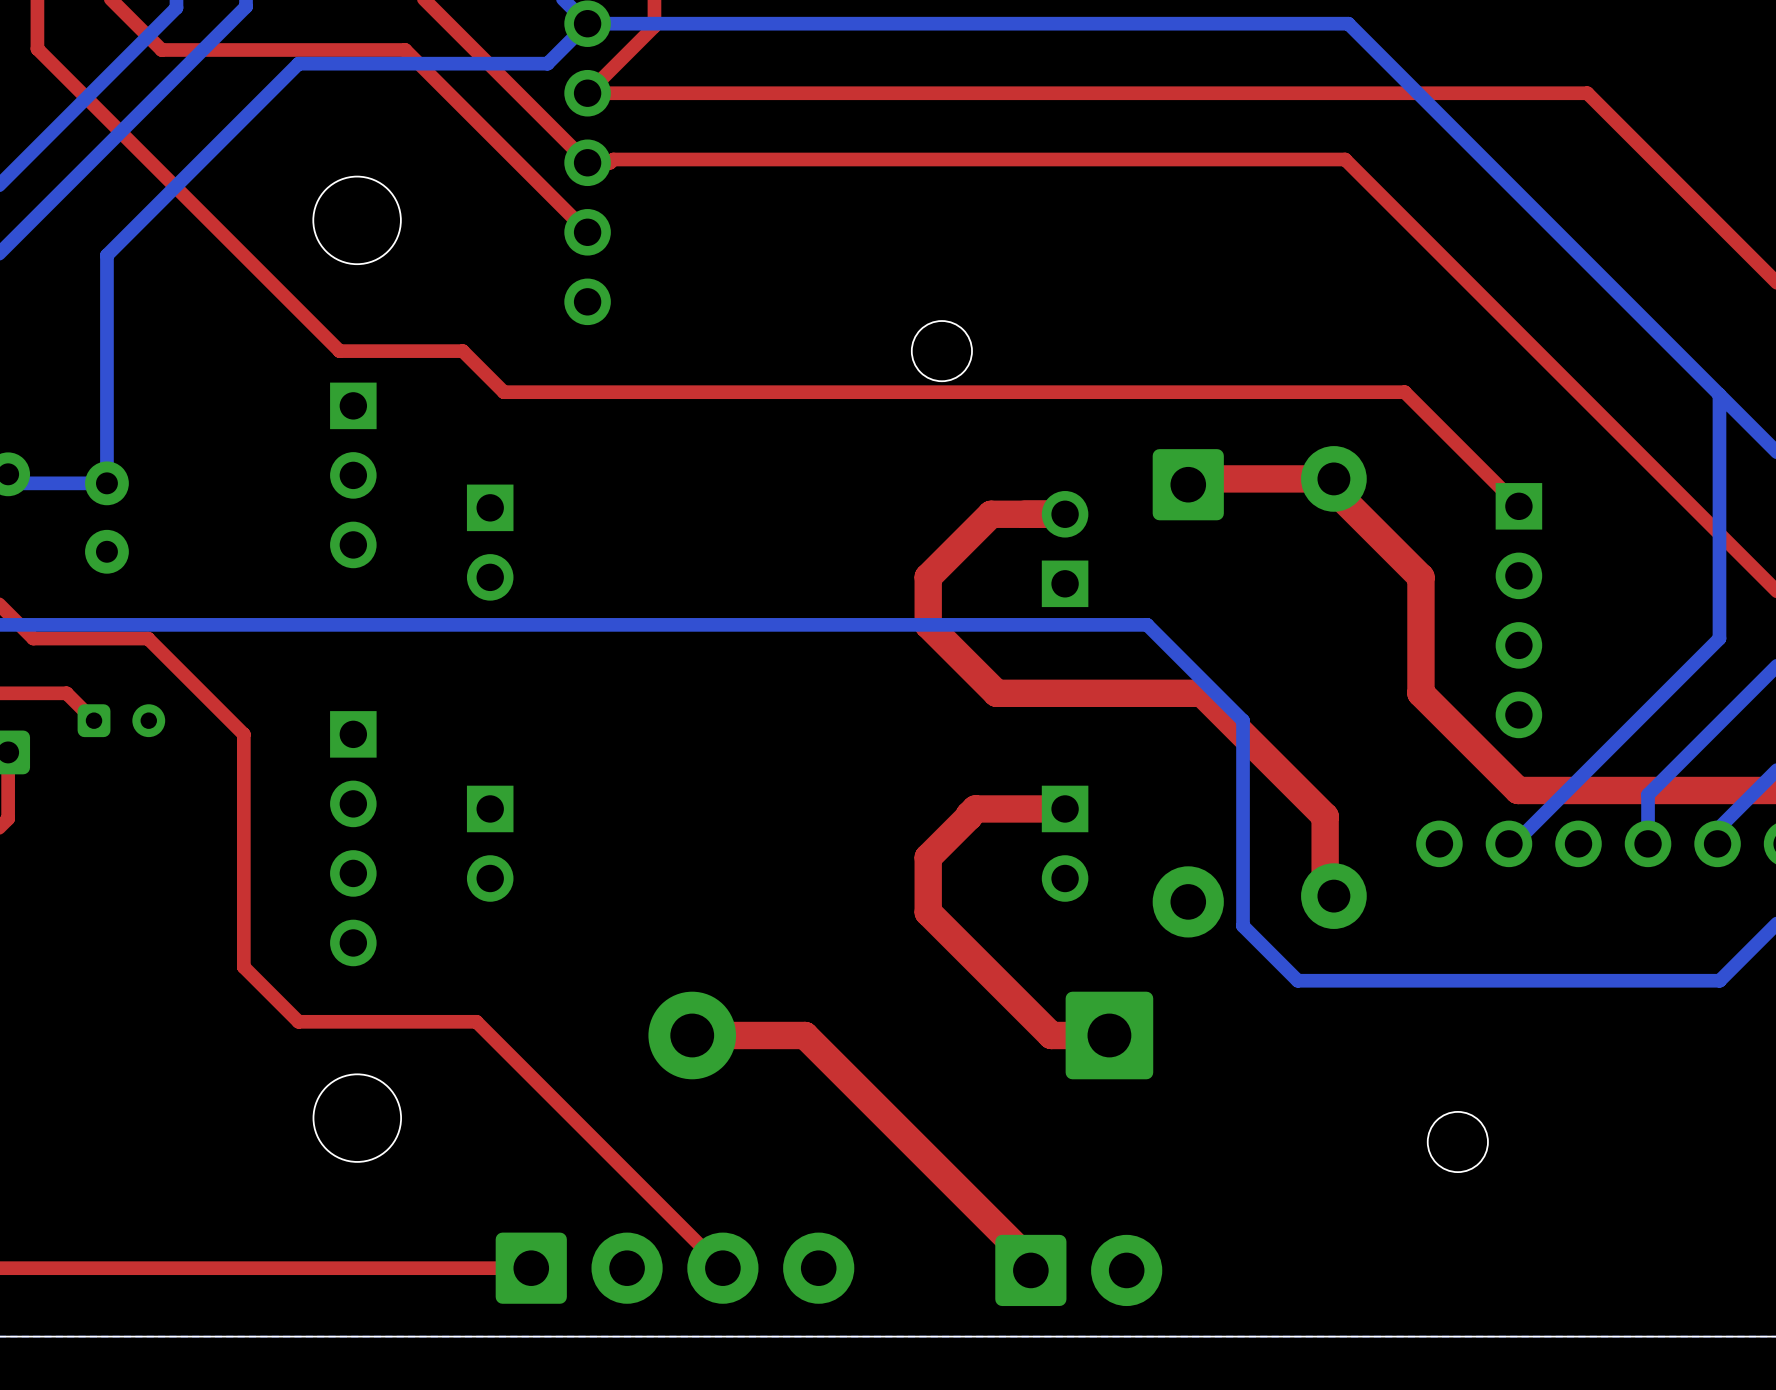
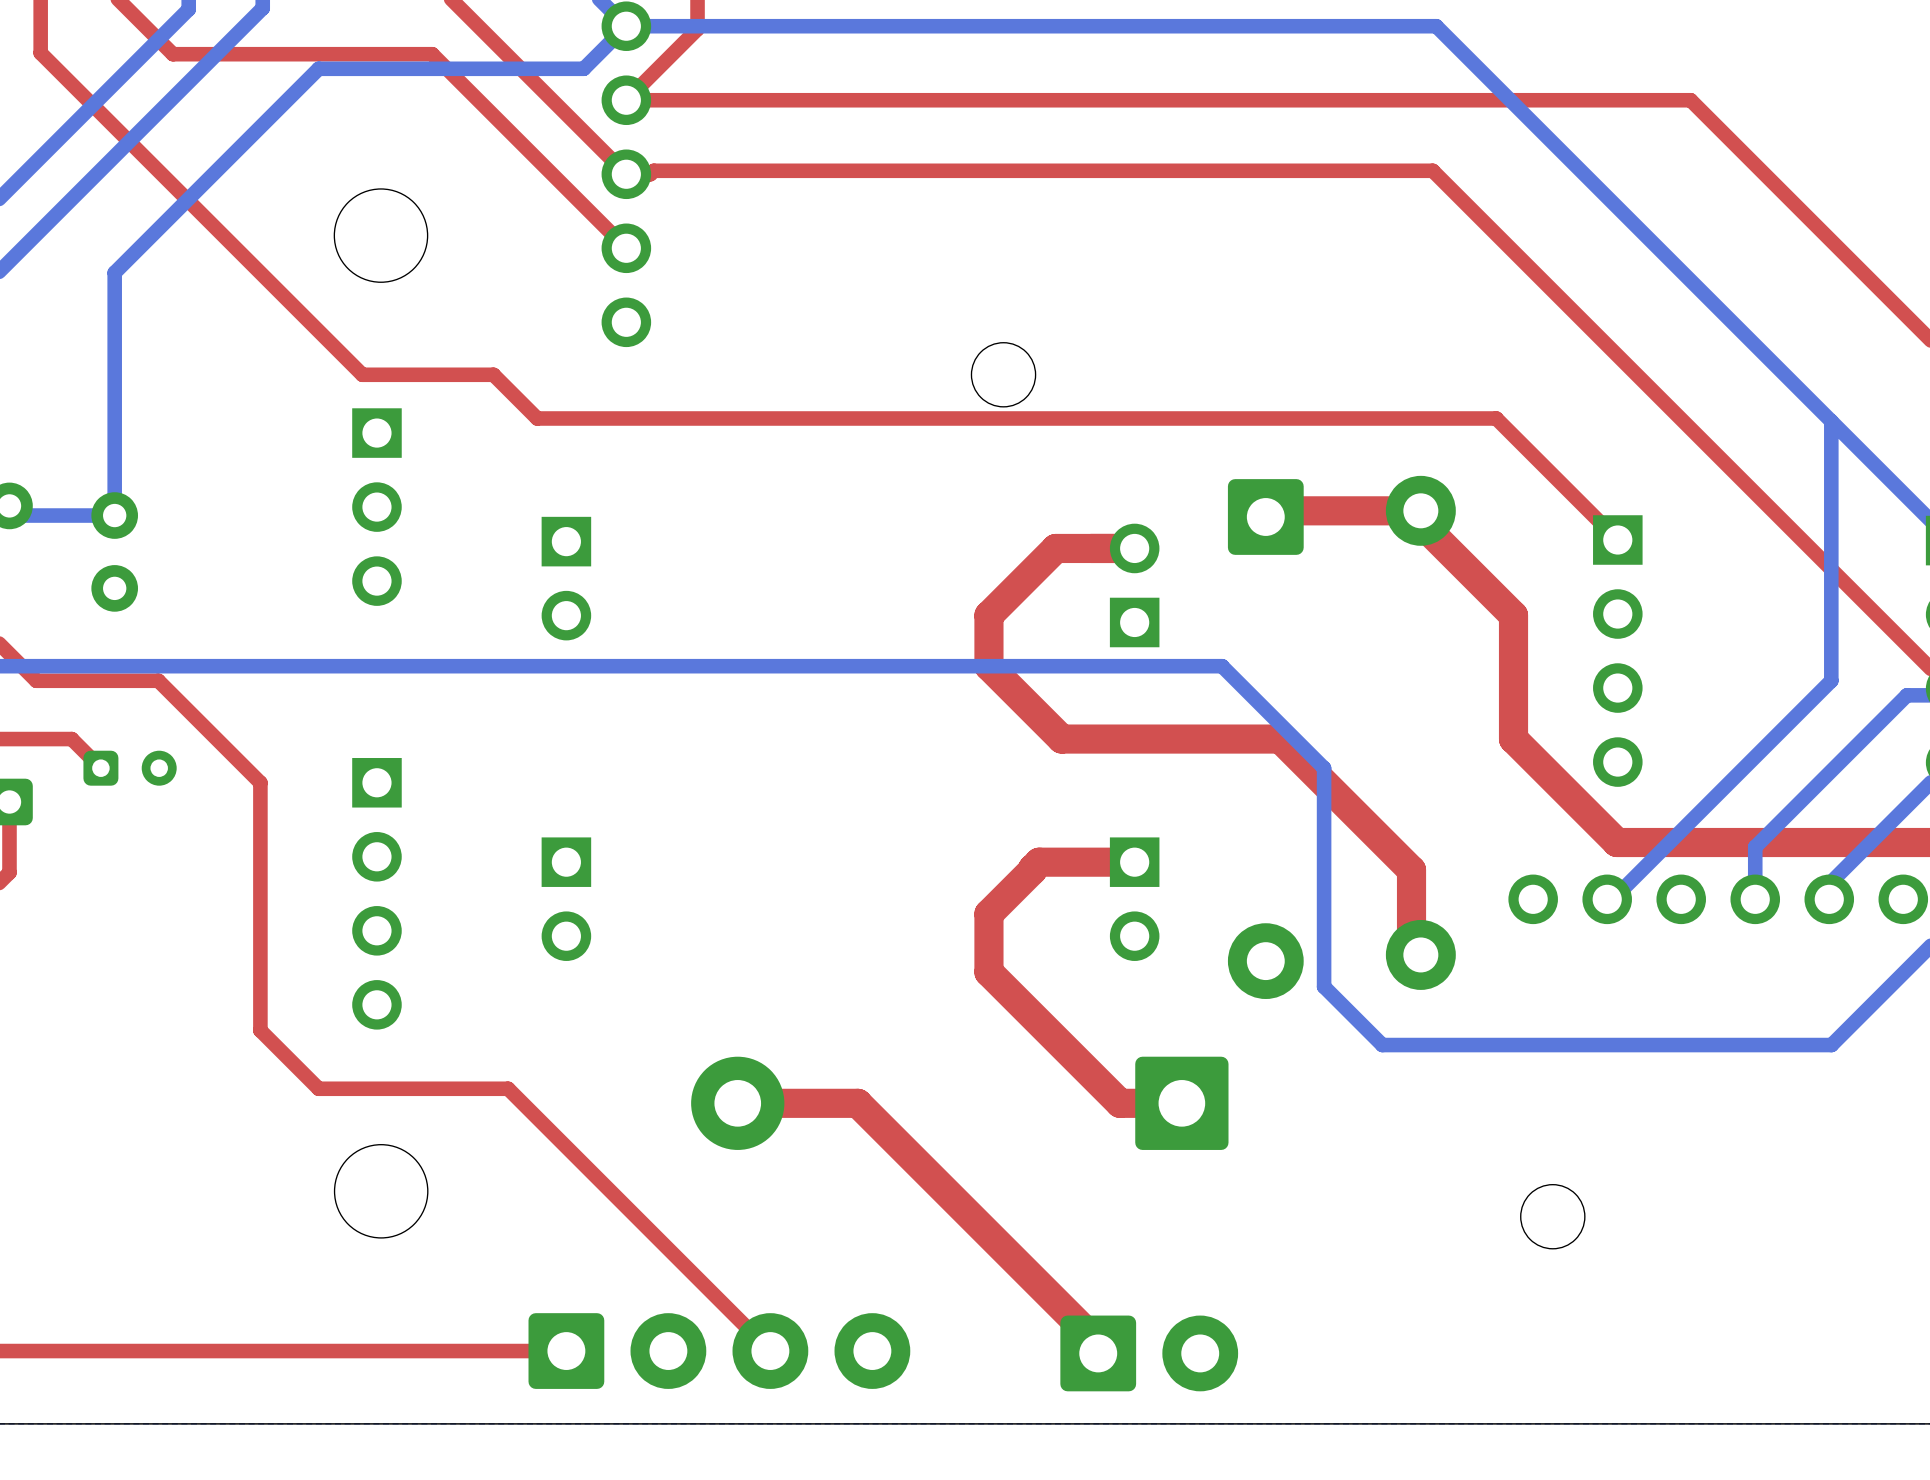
part position: (490, 542) -> (566, 578)
part position: (490, 843) -> (566, 899)

